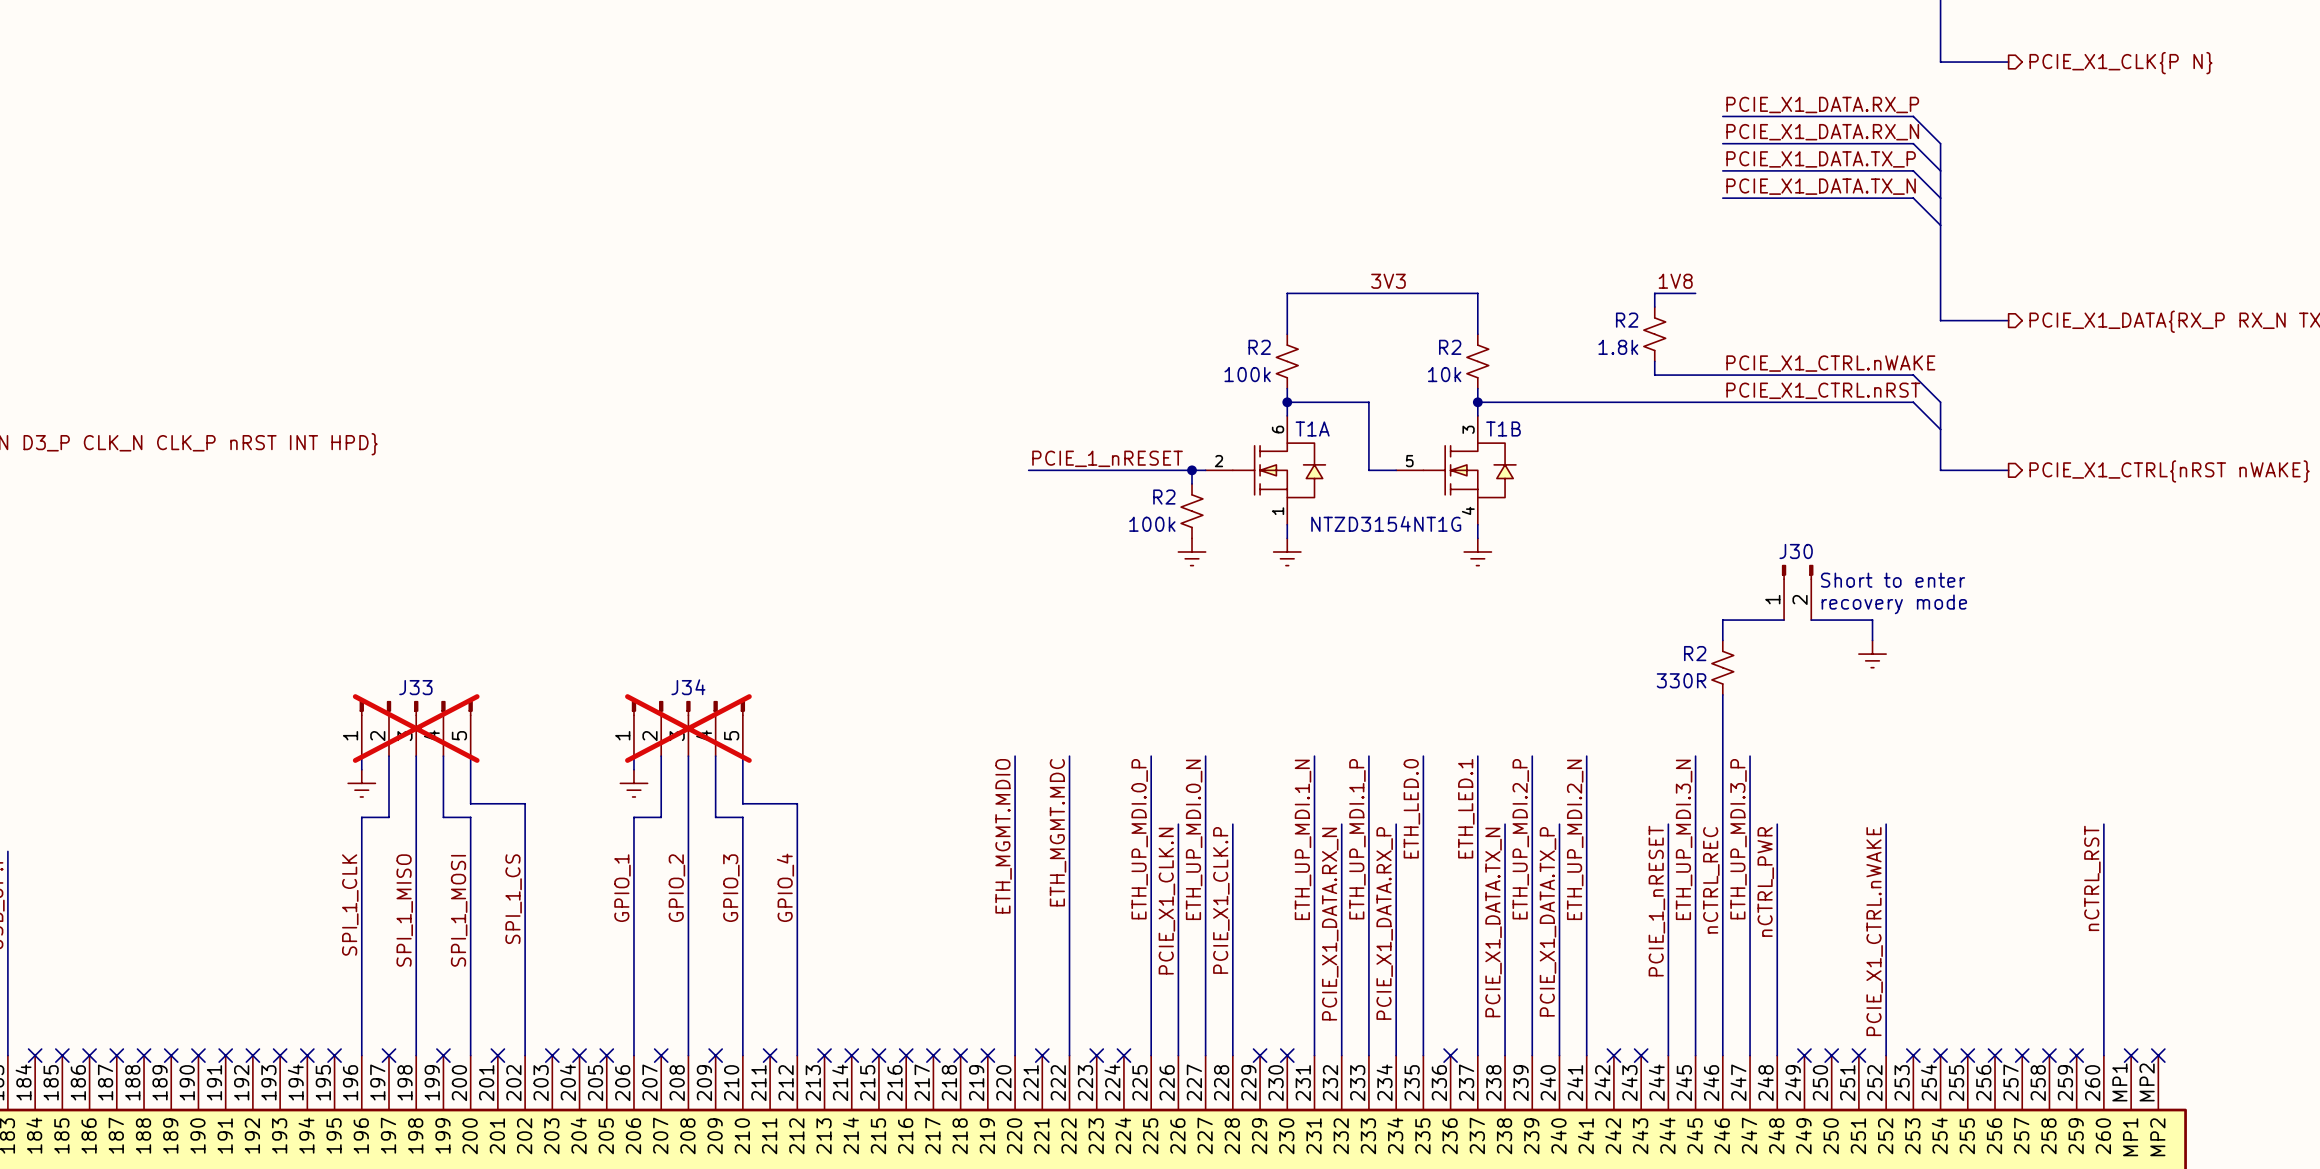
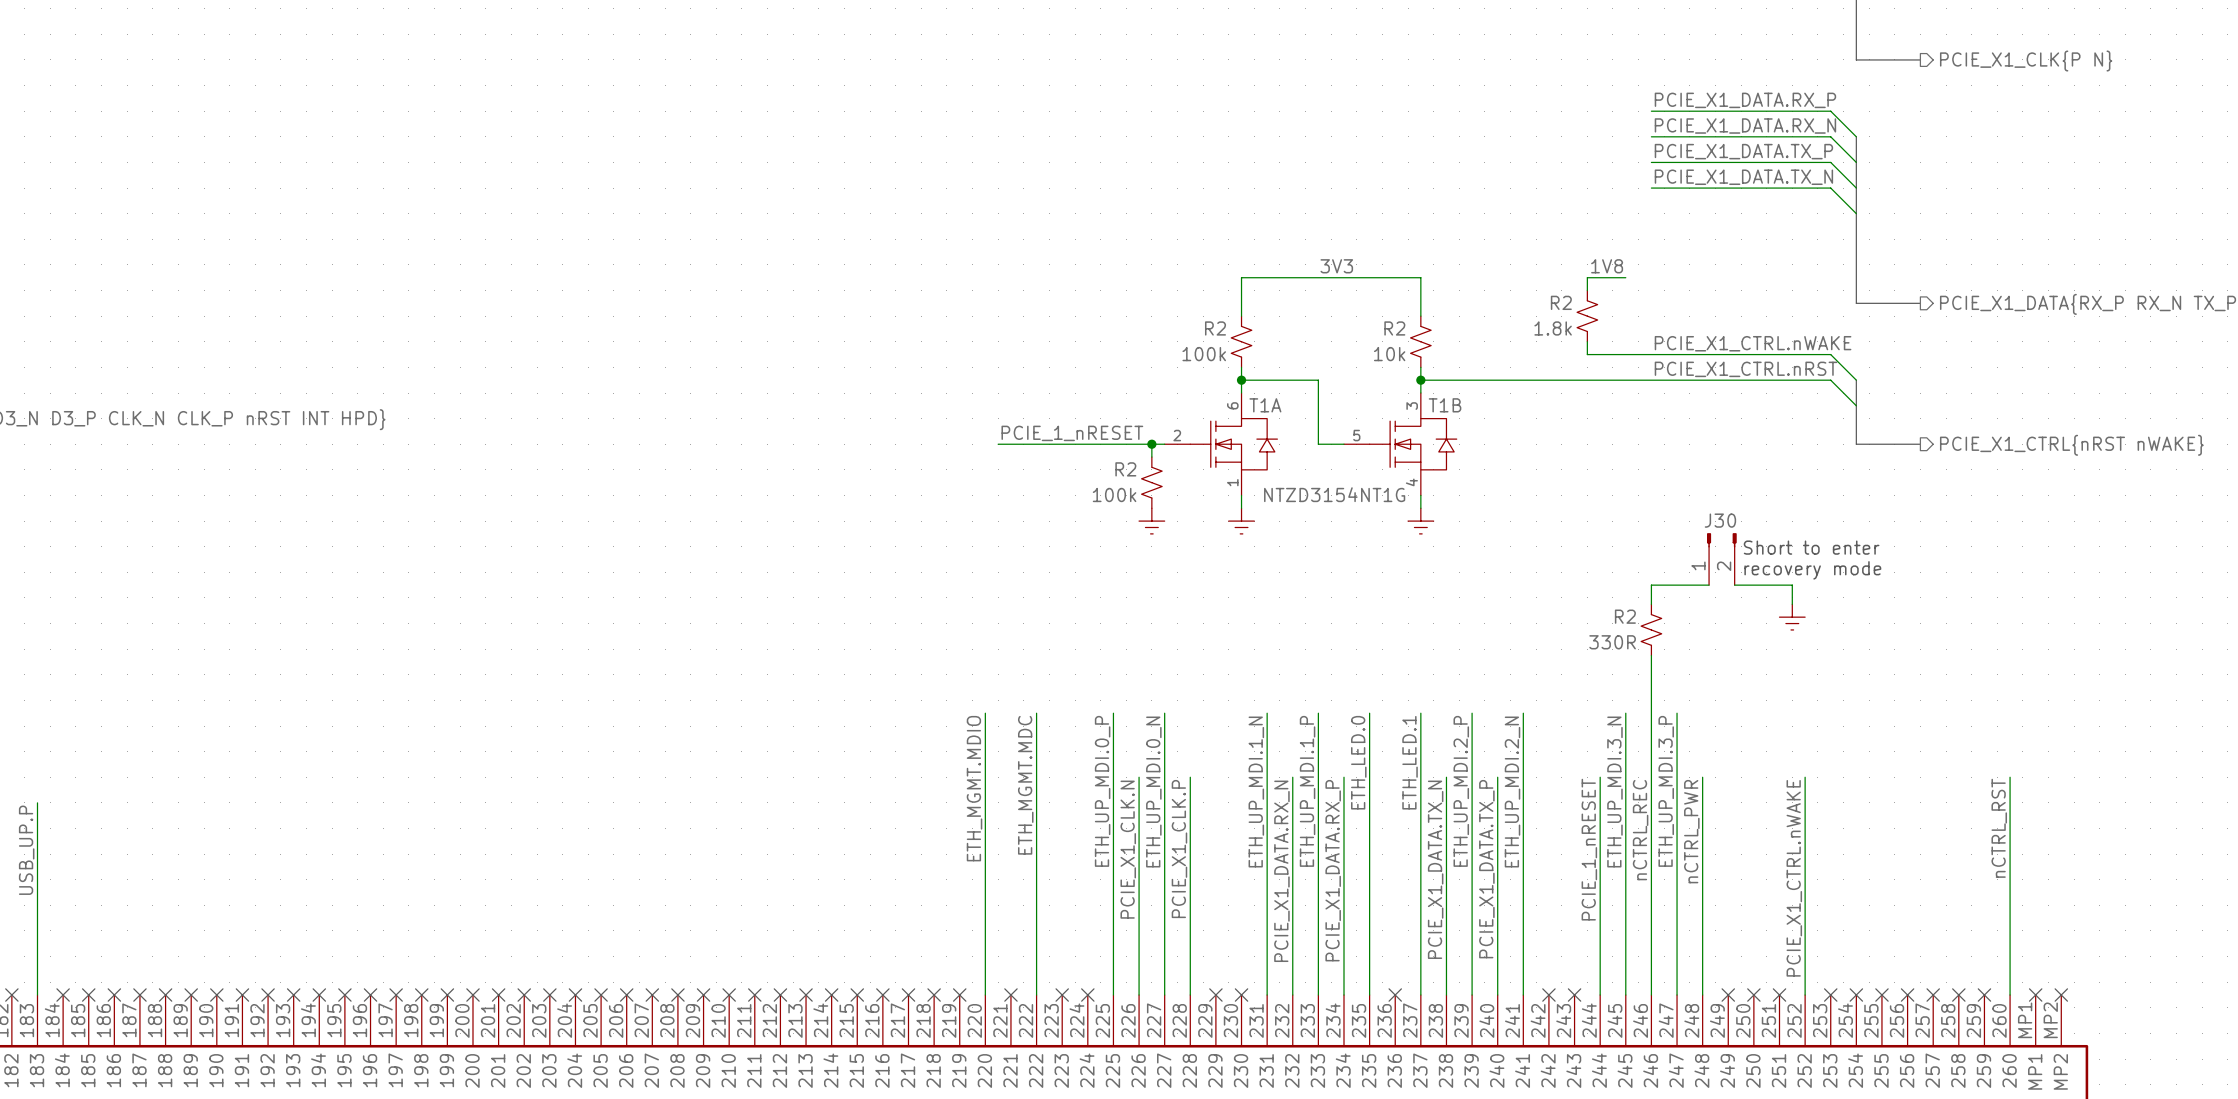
J33: (416, 728) -> none
J34: (688, 728) -> none
wire: (361, 756) (361, 769) -> none
wire: (389, 756) (389, 817) (361, 817) (361, 1055) -> none
wire: (416, 756) (416, 1055) -> none
wire: (443, 756) (443, 817) (470, 817) (470, 1055) -> none
wire: (470, 756) (470, 803) (525, 803) (525, 1055) -> none
wire: (633, 756) (633, 769) -> none
wire: (661, 756) (661, 817) (633, 817) (633, 1055) -> none
wire: (688, 756) (688, 1055) -> none
wire: (715, 756) (715, 817) (742, 817) (742, 1055) -> none
wire: (742, 756) (742, 803) (797, 803) (797, 1055) -> none
power symbol: (361, 783) -> none
power symbol: (633, 783) -> none
label: GPIO_4 (785, 887) -> none
label: GPIO_1 (622, 888) -> none
label: GPIO_2 (676, 888) -> none
label: GPIO_3 (731, 888) -> none
label: SPI_1_CS (513, 899) -> none
label: SPI_1_CLK (350, 904) -> none
label: SPI_1_MISO (404, 910) -> none
label: SPI_1_MOSI (459, 910) -> none
no-connect mark: none -> (370, 995)
no-connect mark: none -> (421, 995)
no-connect mark: none -> (472, 995)
no-connect mark: none -> (524, 995)
no-connect mark: none -> (626, 995)
no-connect mark: none -> (677, 995)
no-connect mark: none -> (729, 995)
no-connect mark: none -> (780, 995)

